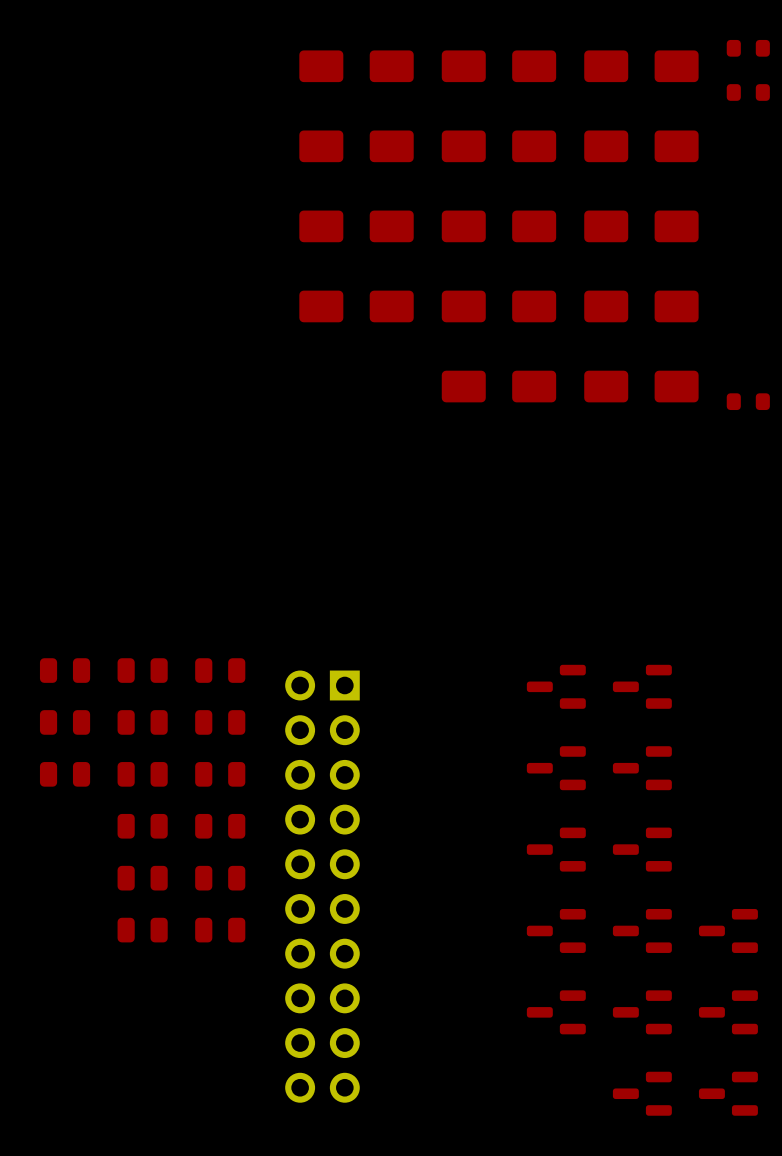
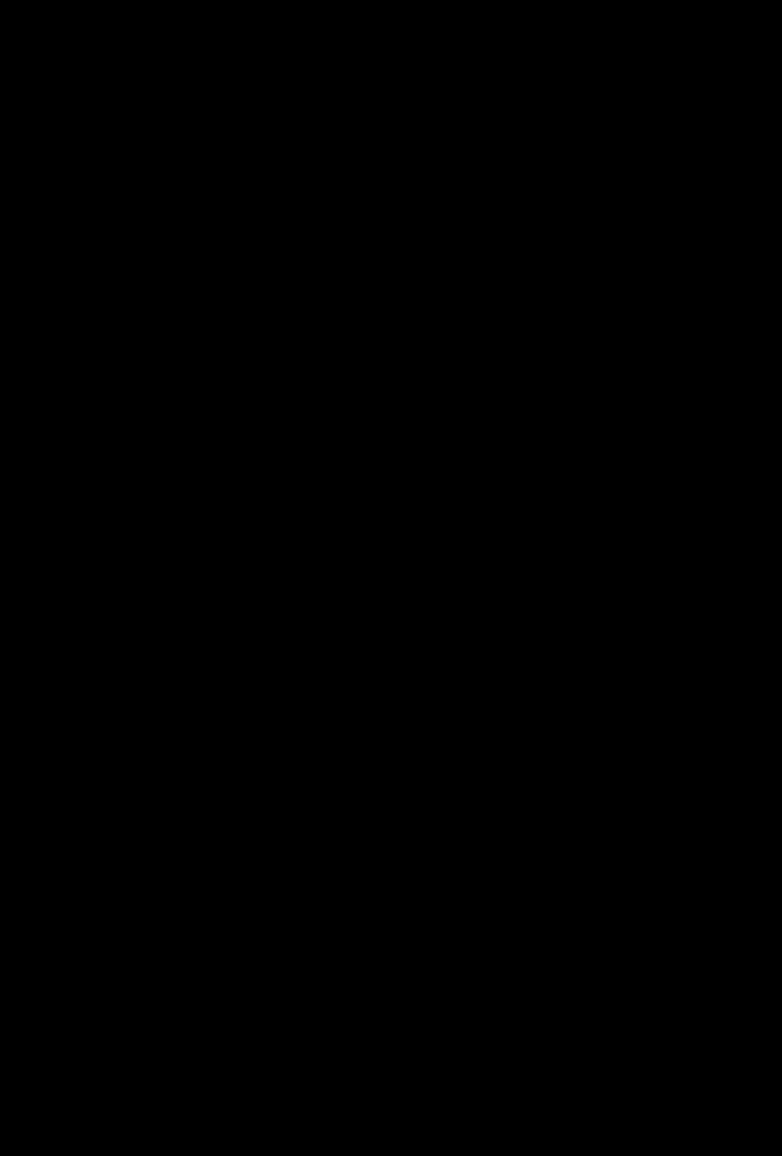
part: (748, 48) -> none
part: (356, 66) -> none
part: (498, 66) -> none
part: (641, 66) -> none
part: (748, 92) -> none
part: (356, 146) -> none
part: (498, 146) -> none
part: (641, 146) -> none
part: (356, 226) -> none
part: (498, 226) -> none
part: (641, 226) -> none
part: (356, 306) -> none
part: (498, 306) -> none
part: (641, 306) -> none
part: (498, 386) -> none
part: (641, 386) -> none
part: (748, 401) -> none
part: (65, 670) -> none
part: (142, 670) -> none
part: (220, 670) -> none
part: (556, 686) -> none
part: (642, 686) -> none
part: (65, 722) -> none
part: (142, 722) -> none
part: (220, 722) -> none
part: (556, 768) -> none
part: (642, 768) -> none
part: (65, 774) -> none
part: (142, 774) -> none
part: (220, 774) -> none
part: (142, 826) -> none
part: (220, 826) -> none
part: (556, 849) -> none
part: (642, 849) -> none
part: (142, 878) -> none
part: (220, 878) -> none
part: (322, 886) -> none
part: (142, 930) -> none
part: (220, 930) -> none
part: (556, 930) -> none
part: (642, 930) -> none
part: (728, 930) -> none
part: (556, 1012) -> none
part: (642, 1012) -> none
part: (728, 1012) -> none
part: (642, 1093) -> none
part: (728, 1093) -> none

